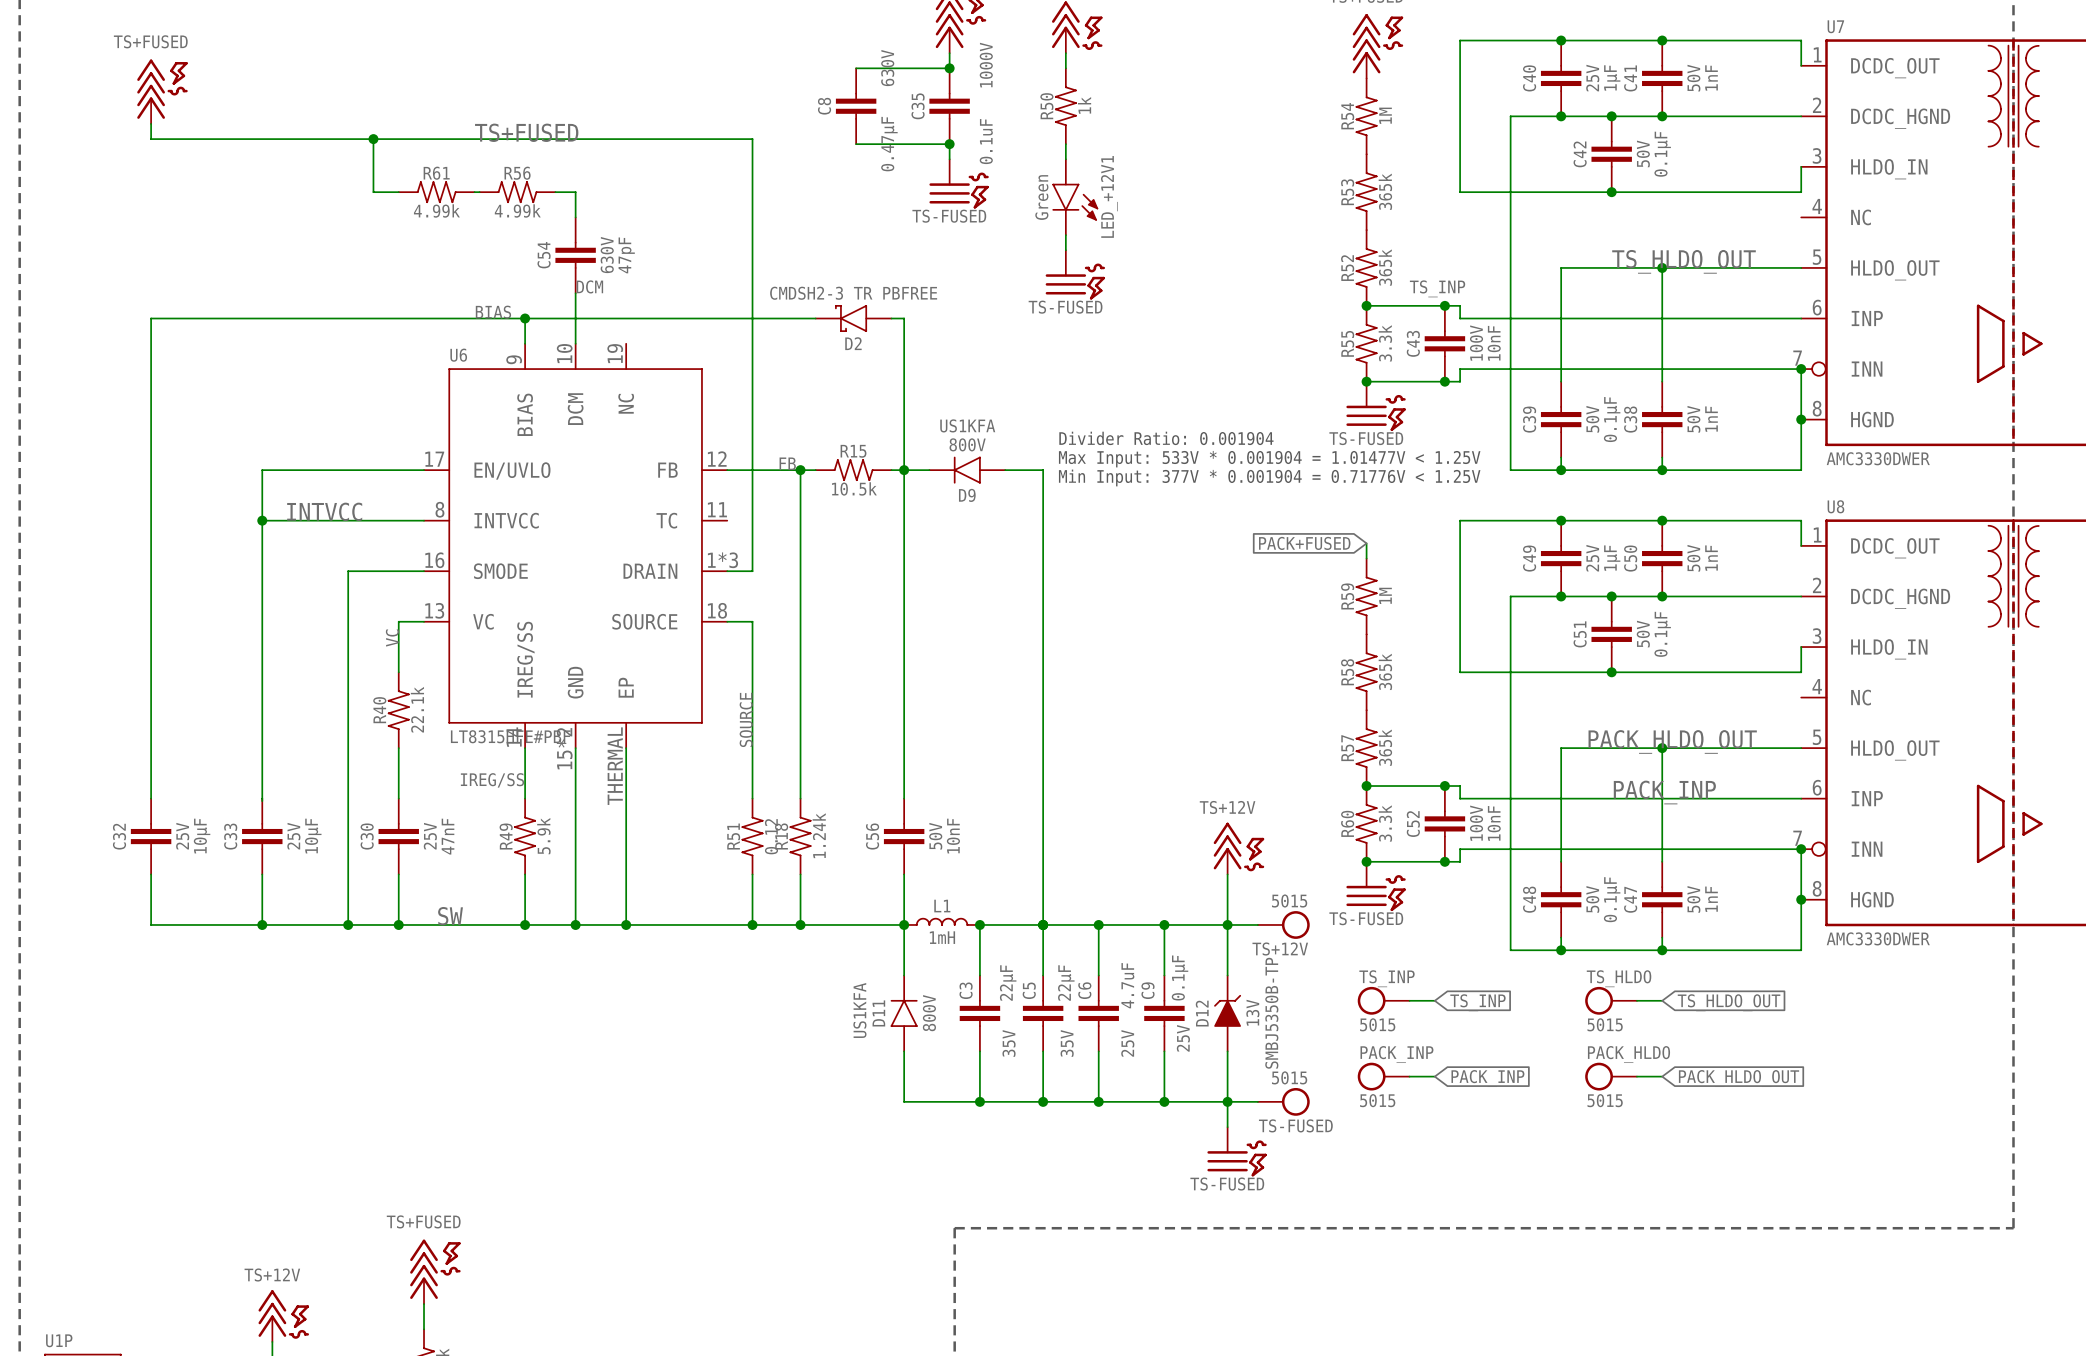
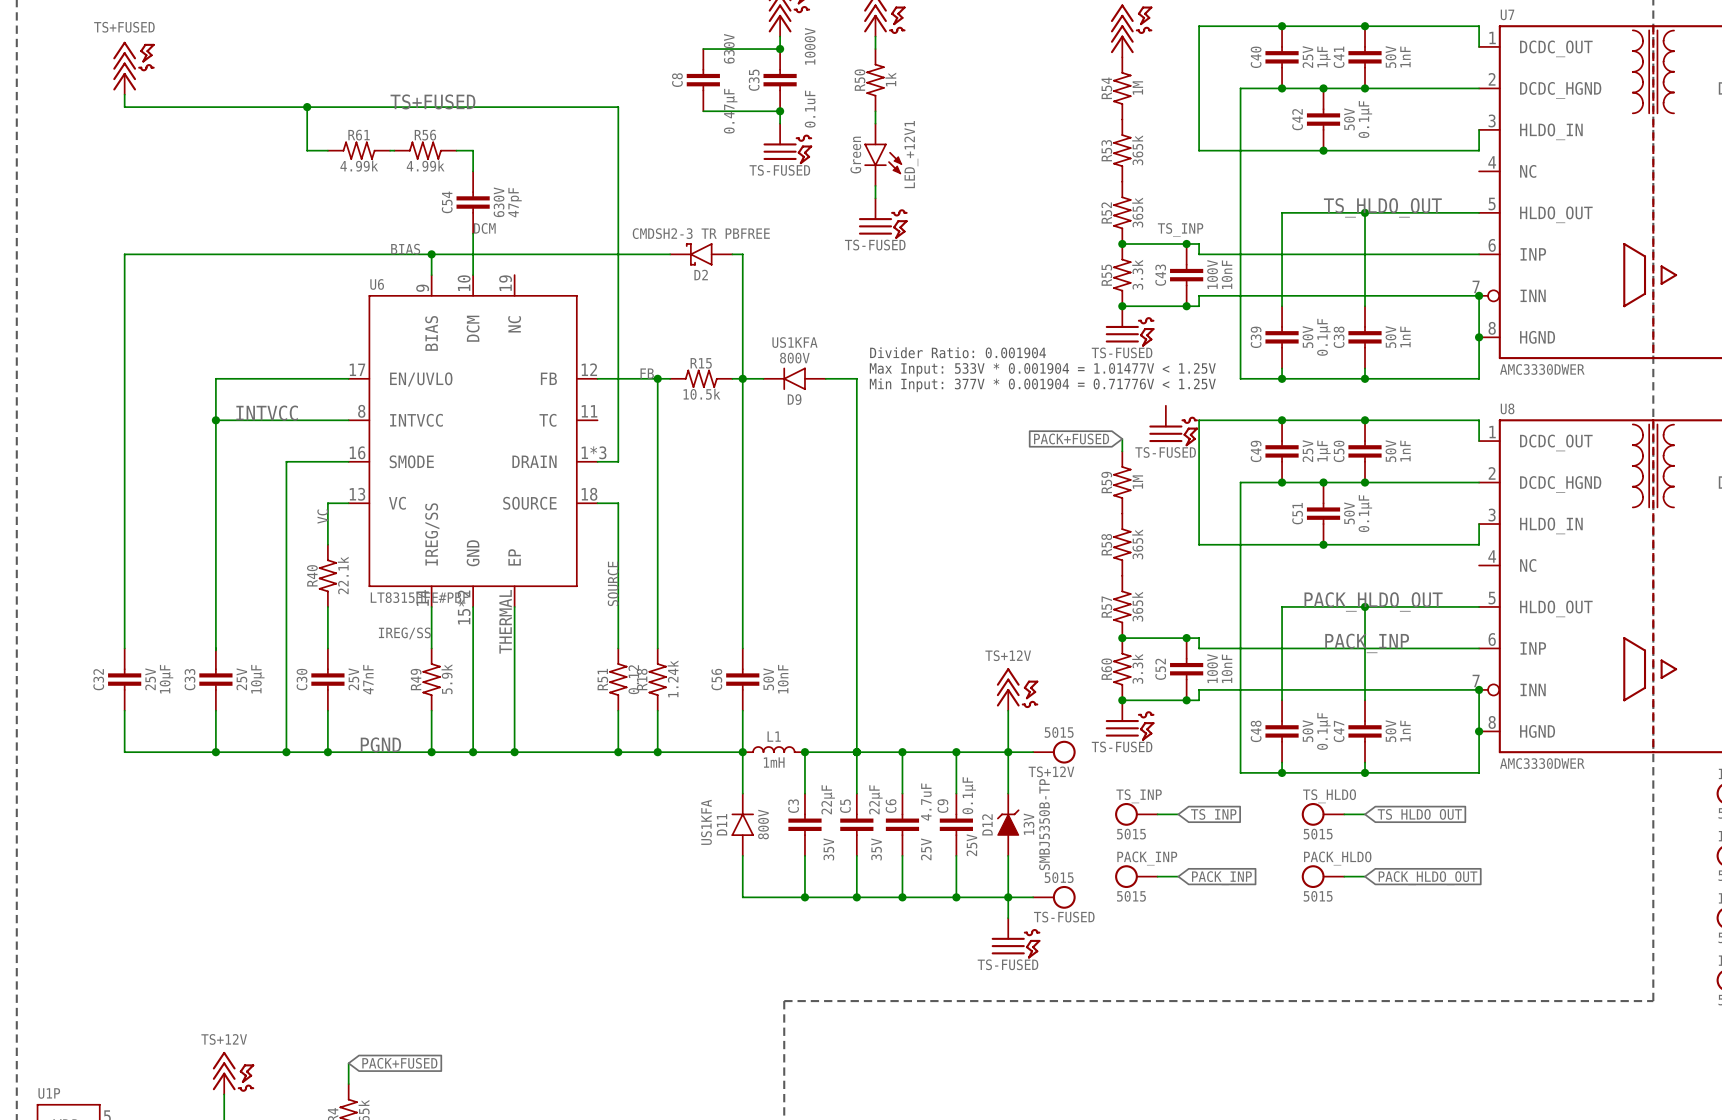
power symbol: none -> TS-FUSED (1173, 426)
label: SW (450, 916) -> PGND (380, 744)
power symbol: TS+FUSED (435, 1271) -> none
global label: none -> PACK+FUSED (399, 1063)

